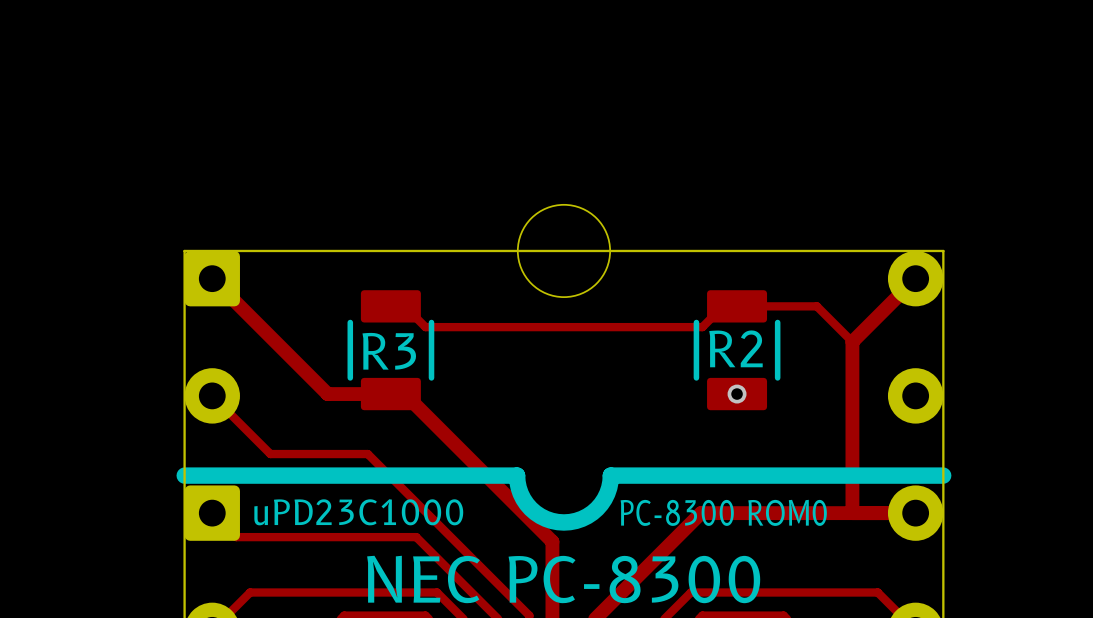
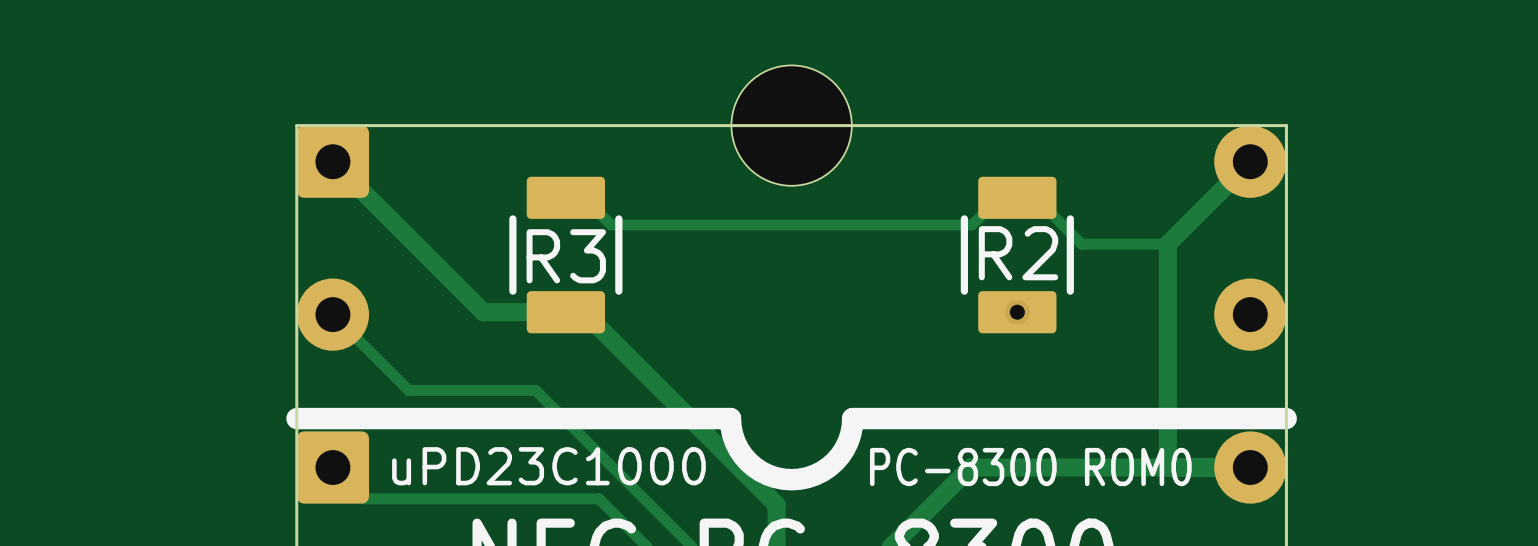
track: (737, 306) (816, 306) (852, 341) -> (1017, 197) (1032, 212) (1050, 212) (1081, 244) (1167, 244)

